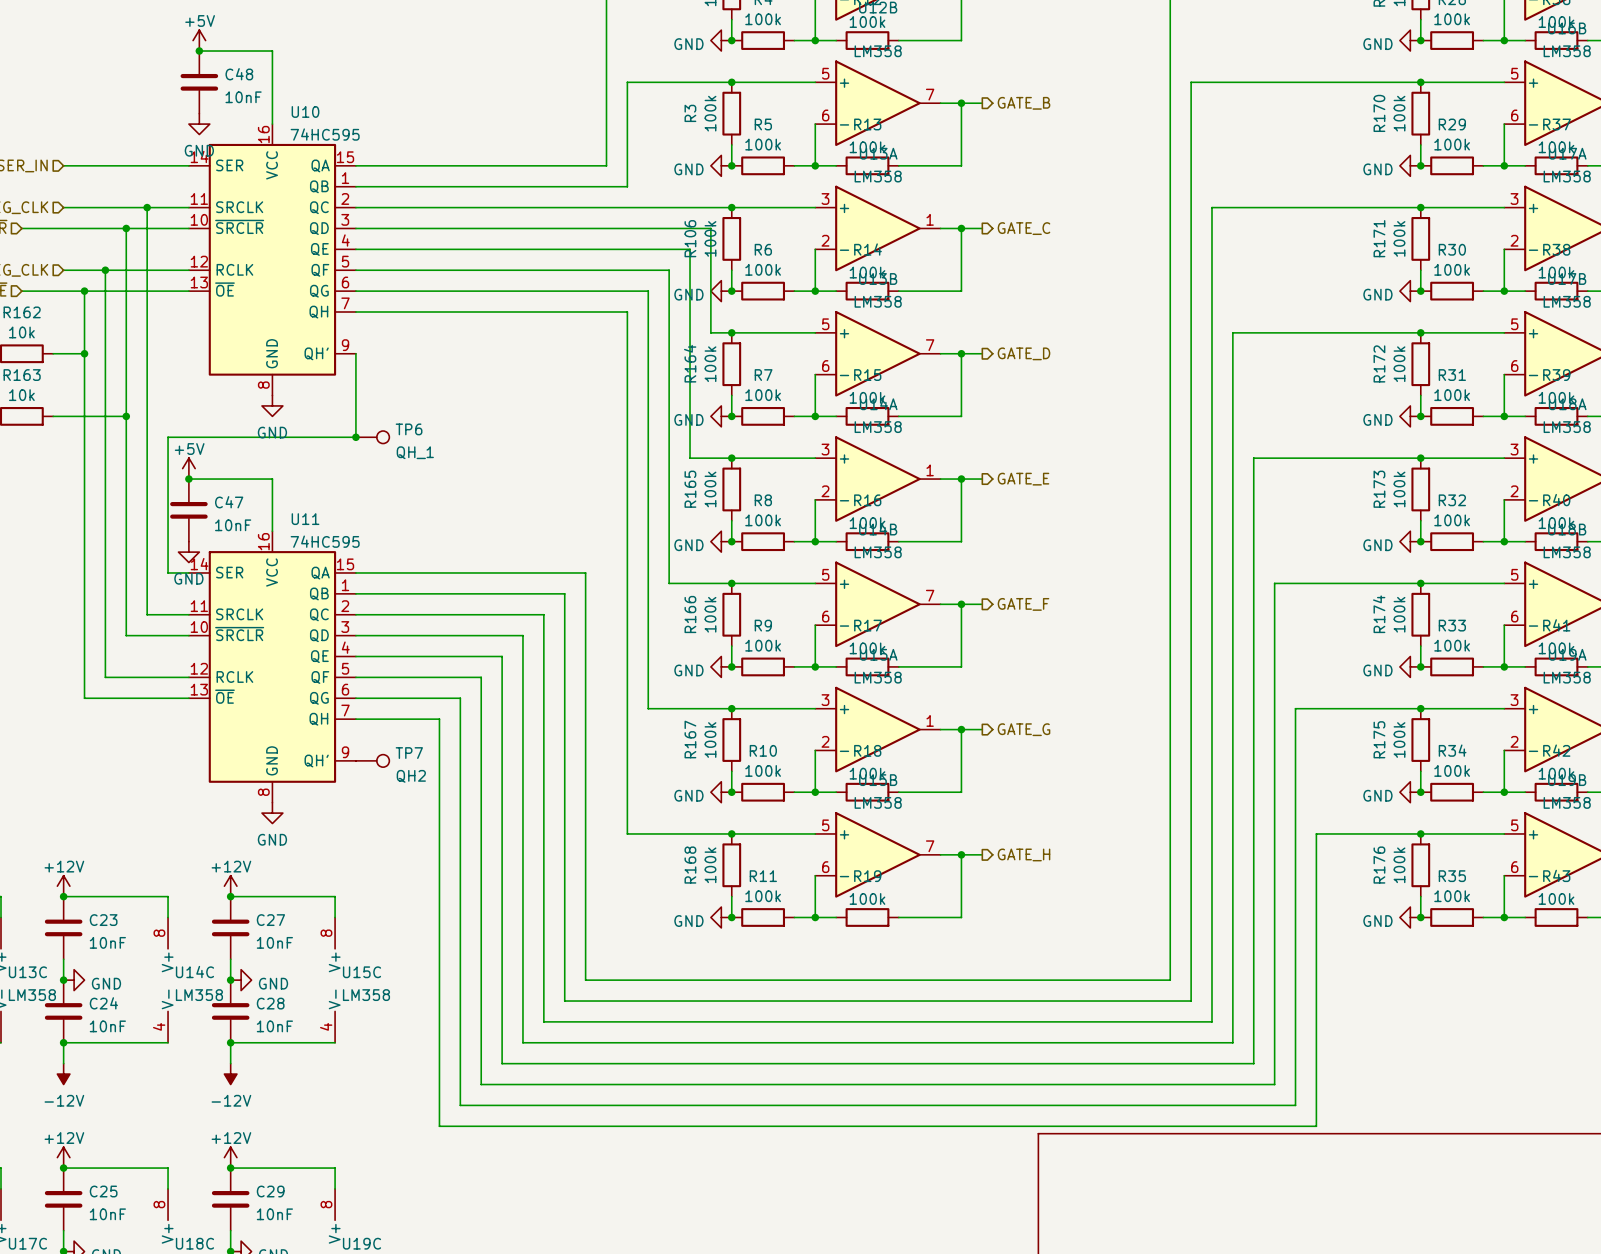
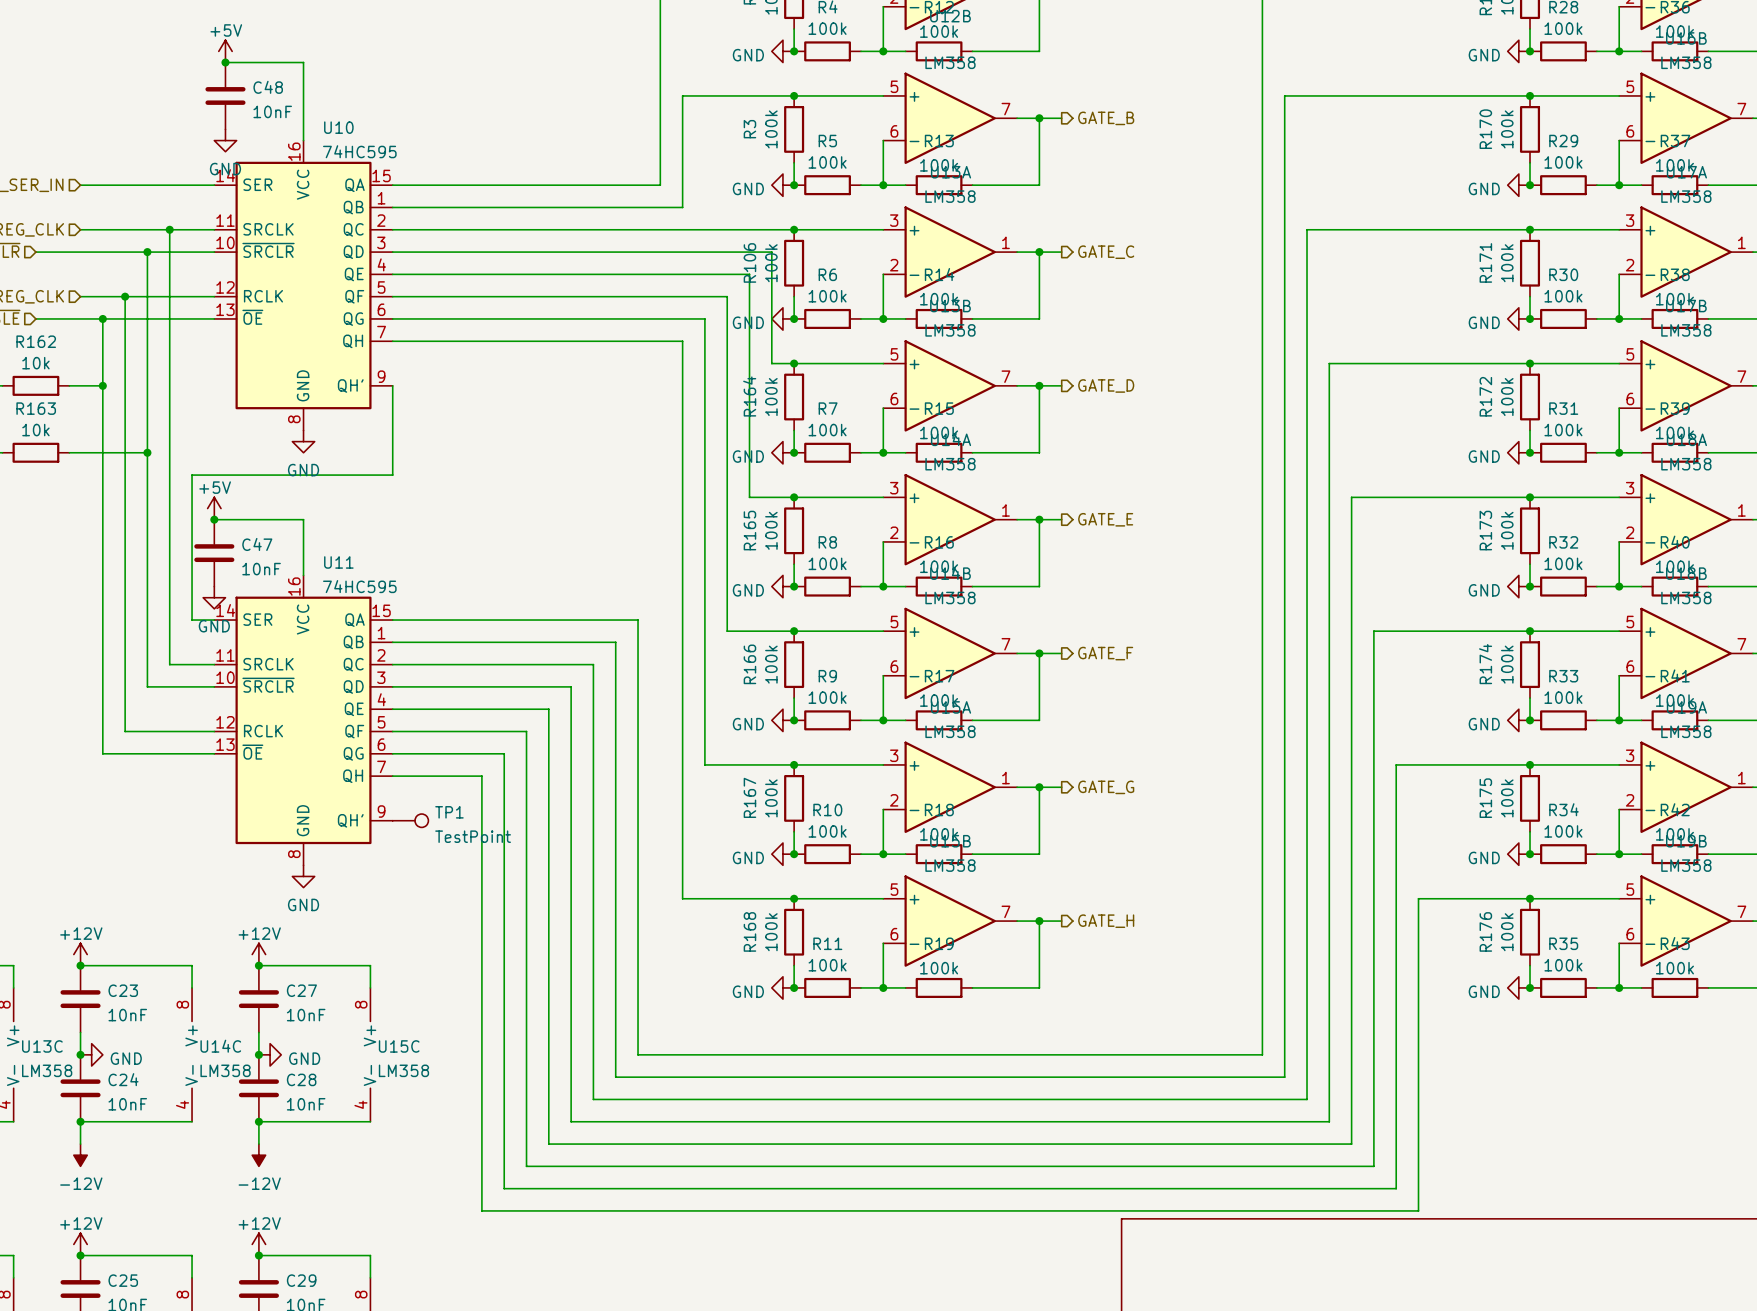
junction: (355, 437) -> none
TP6: QH_1 (372, 437) -> none
TP7 name: TP7 (409, 753) -> TP1 (449, 812)
TP7 value: QH2 (411, 776) -> TestPoint (473, 836)

